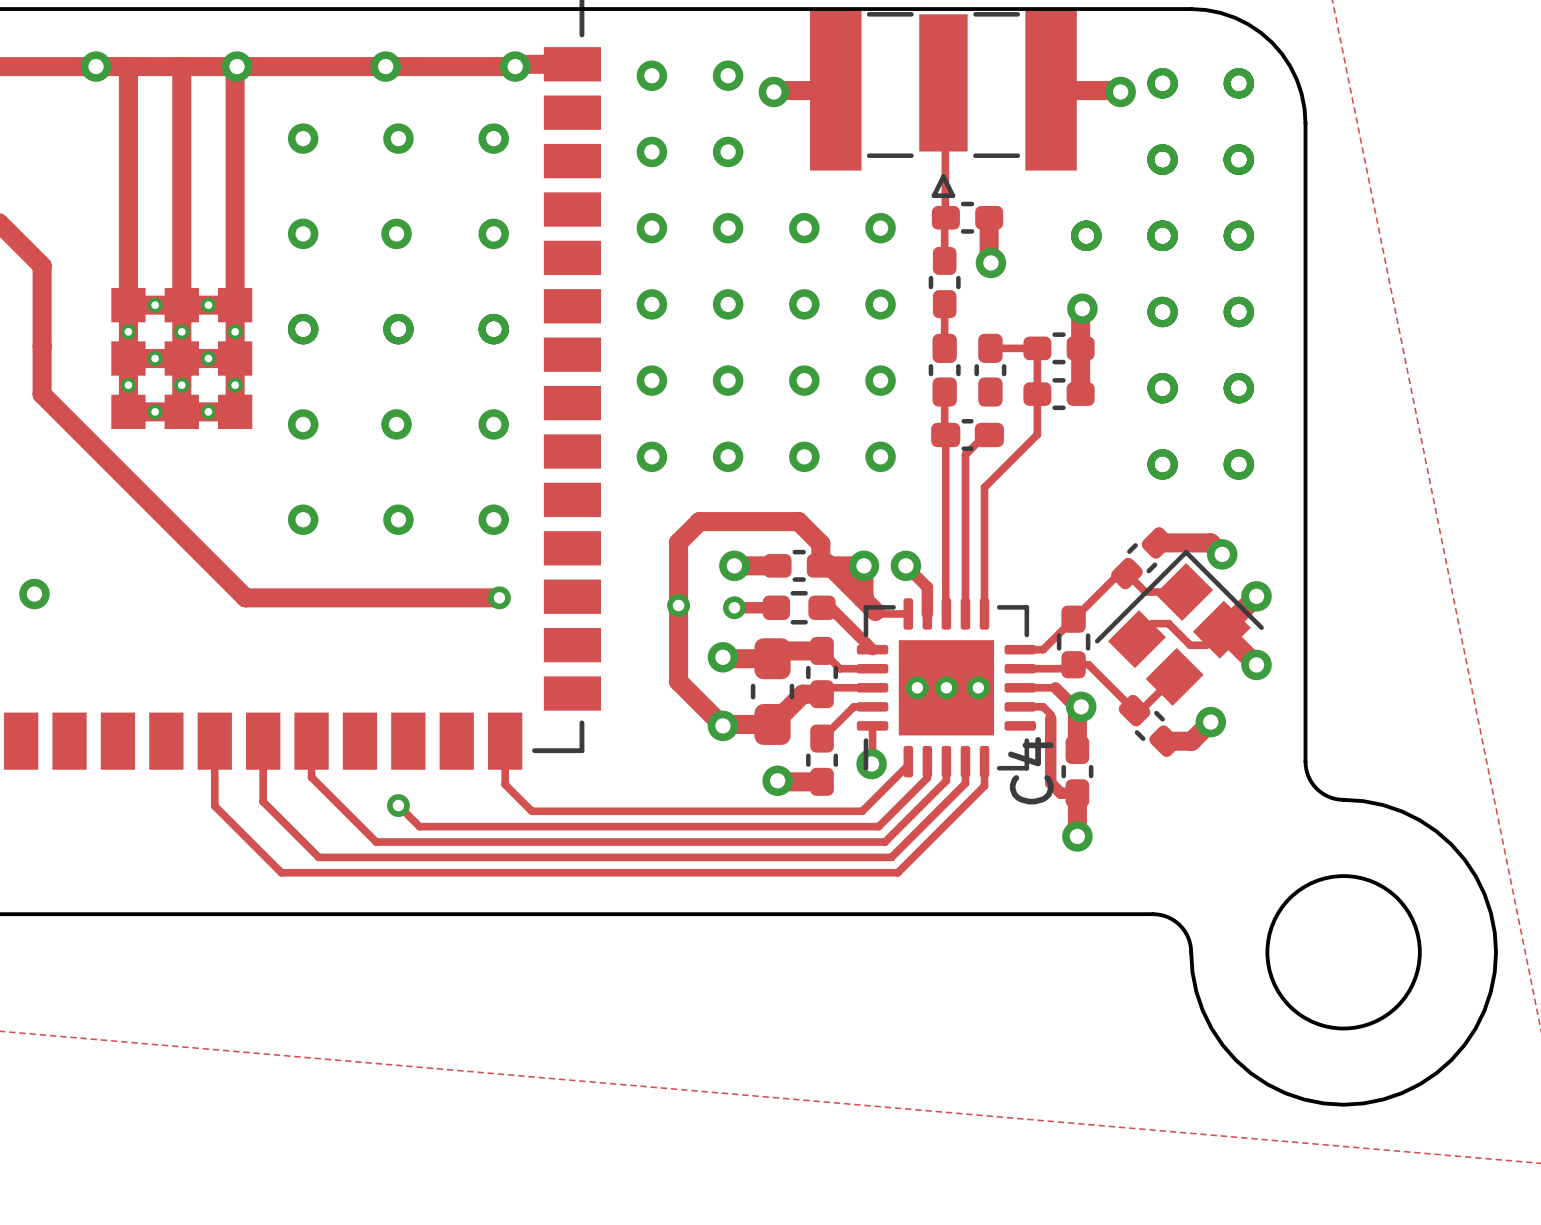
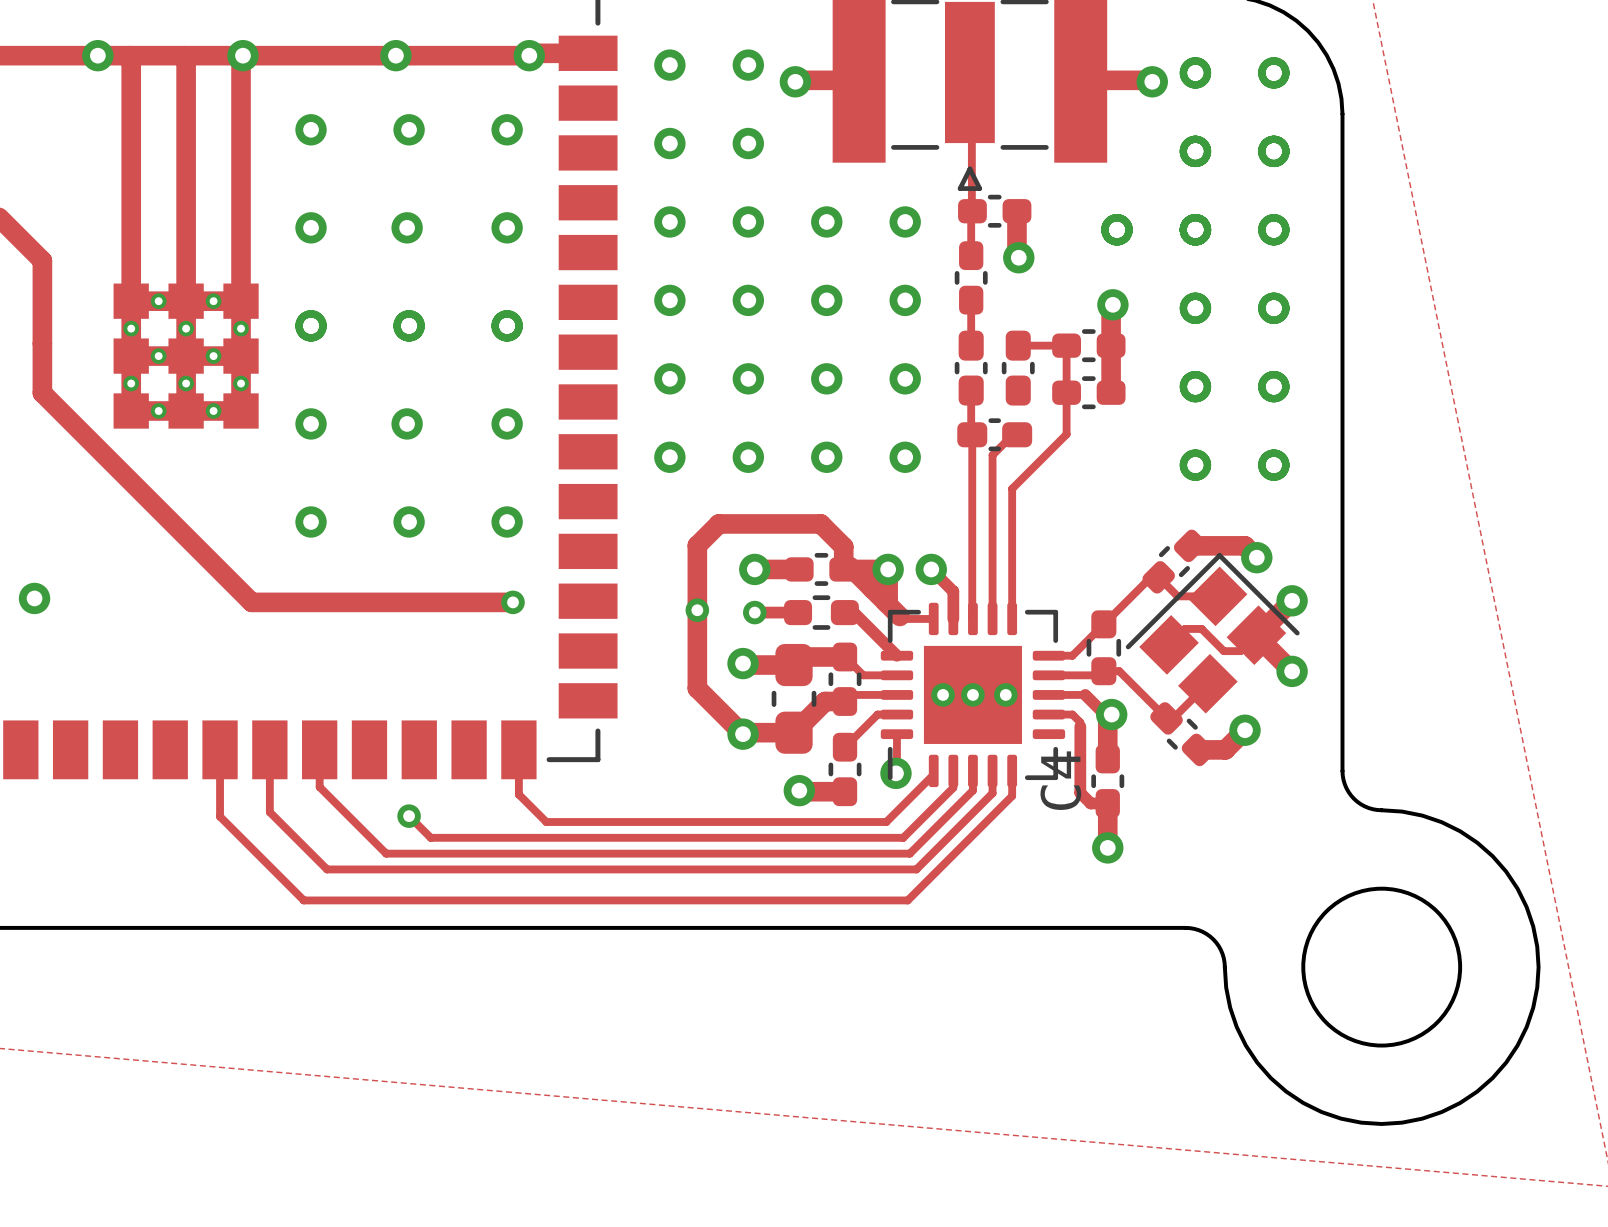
track: (281, 872) (897, 872) -> (288, 885) (303, 900) (907, 900) (922, 885)

